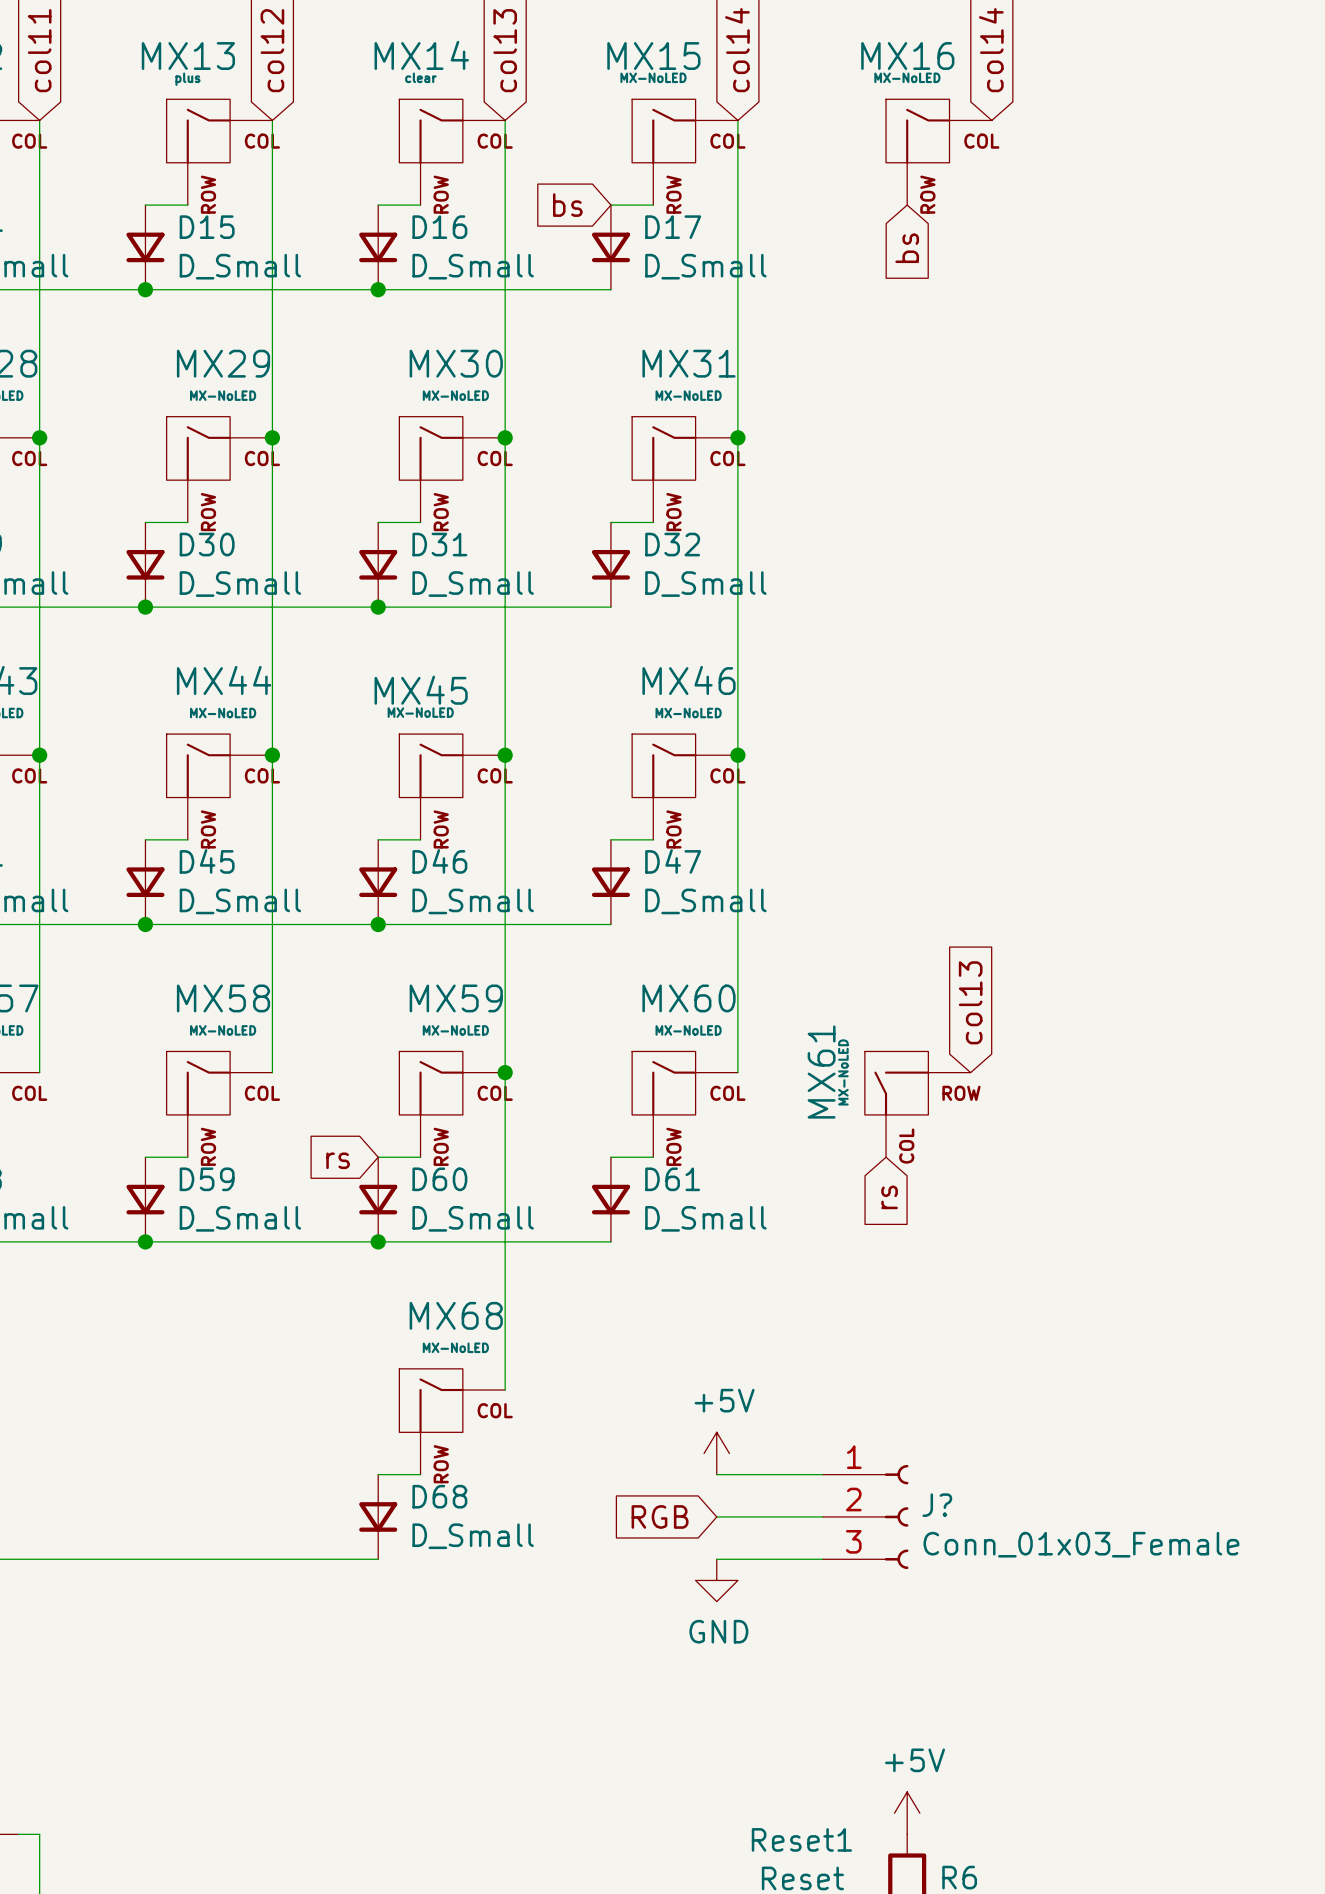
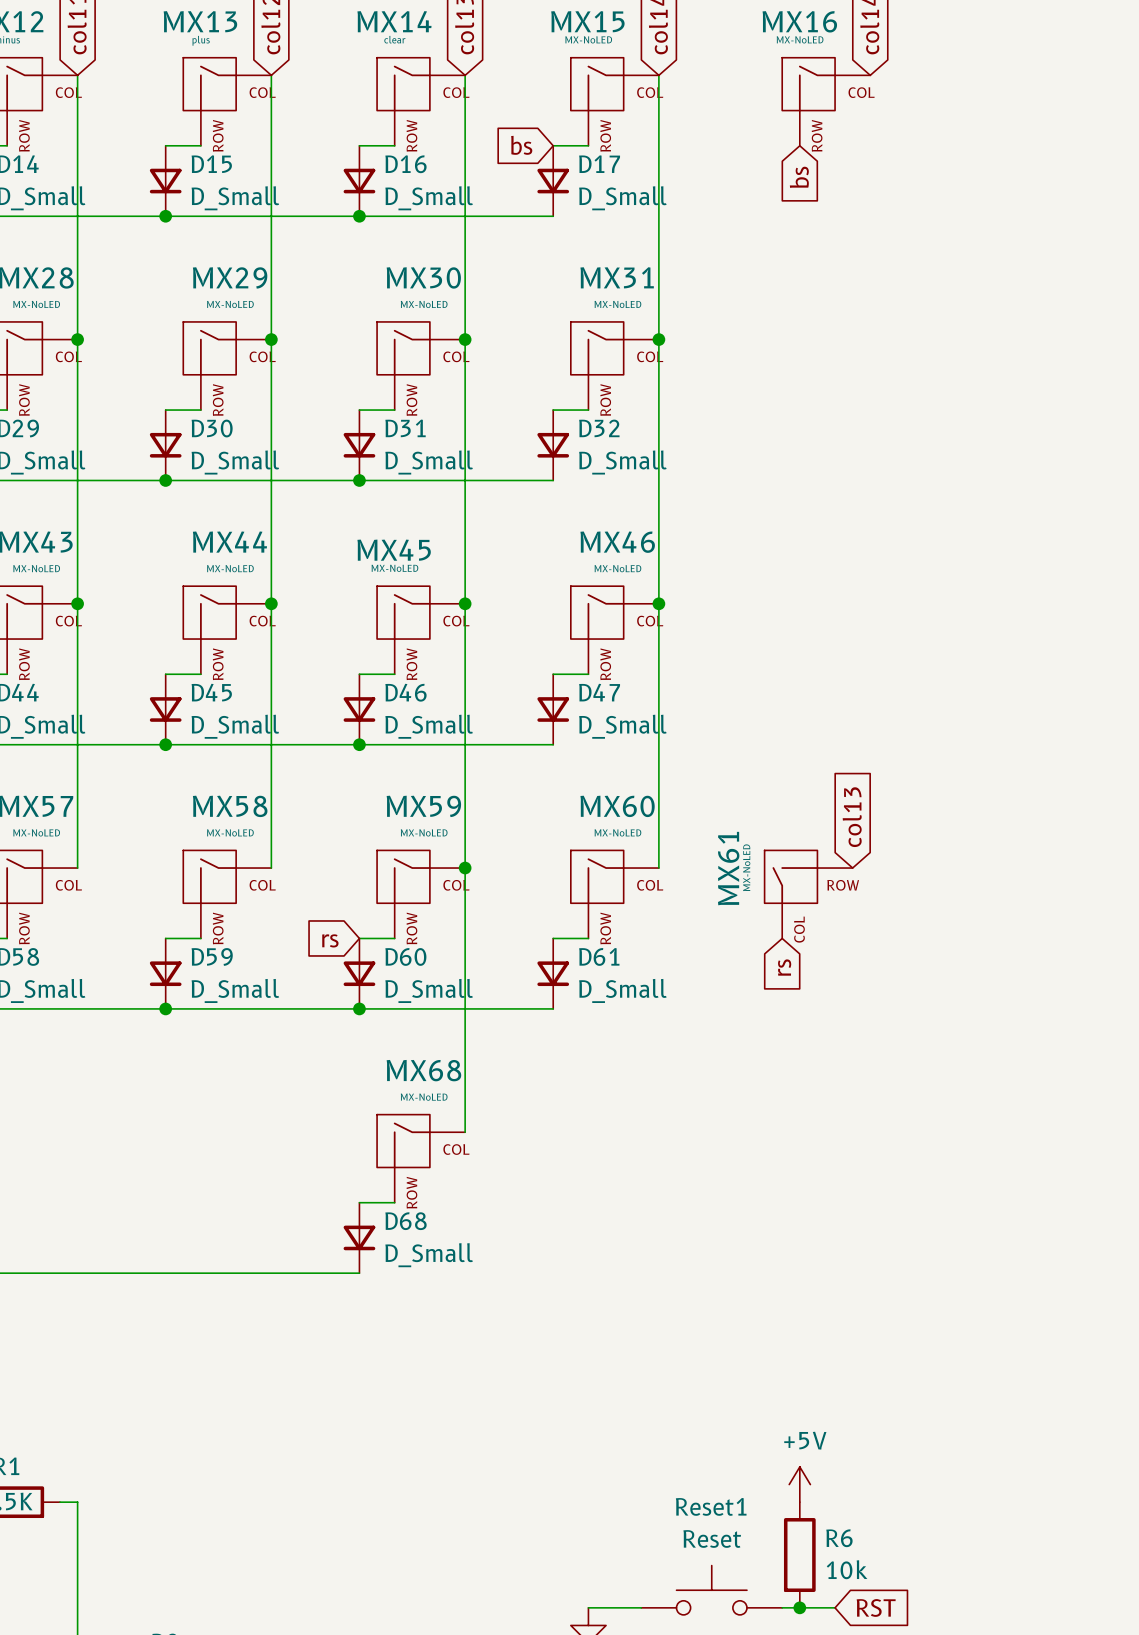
power symbol: +5V (716, 1453) -> none
wire: (716, 1474) (822, 1474) -> none
global label: RGB (660, 1516) -> none
wire: (716, 1516) (822, 1516) -> none
J?: Conn_01x03_Female (865, 1516) -> none
wire: (716, 1559) (822, 1559) -> none
power symbol: GND (716, 1580) -> none

